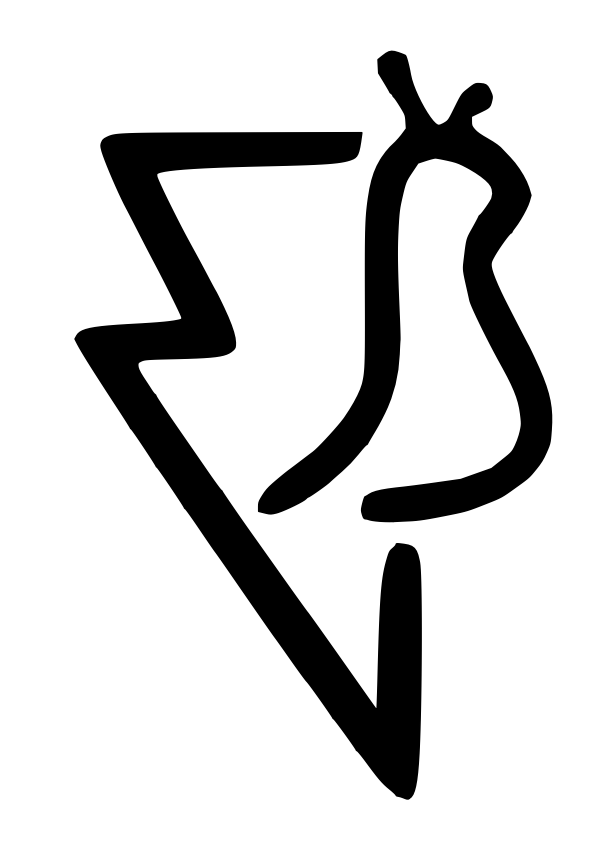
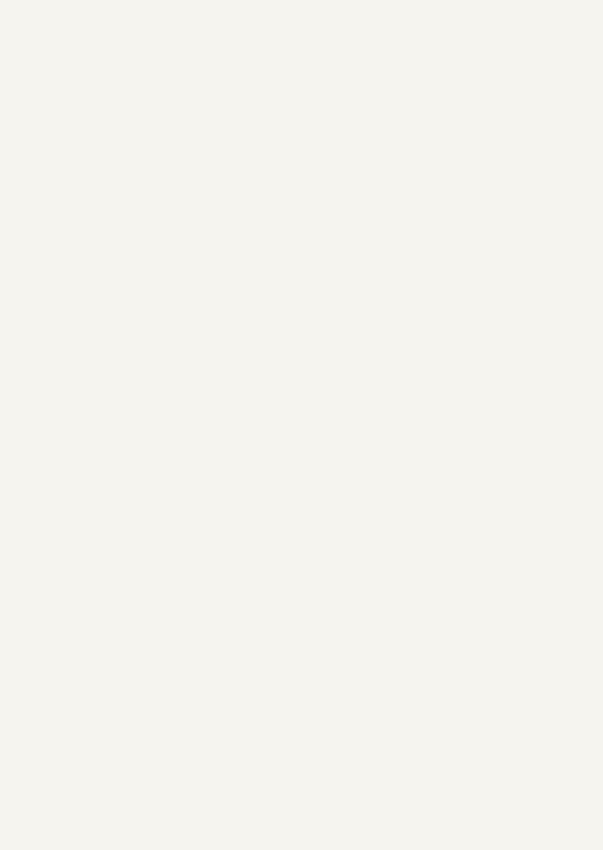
power symbol: (313, 425) -> none

